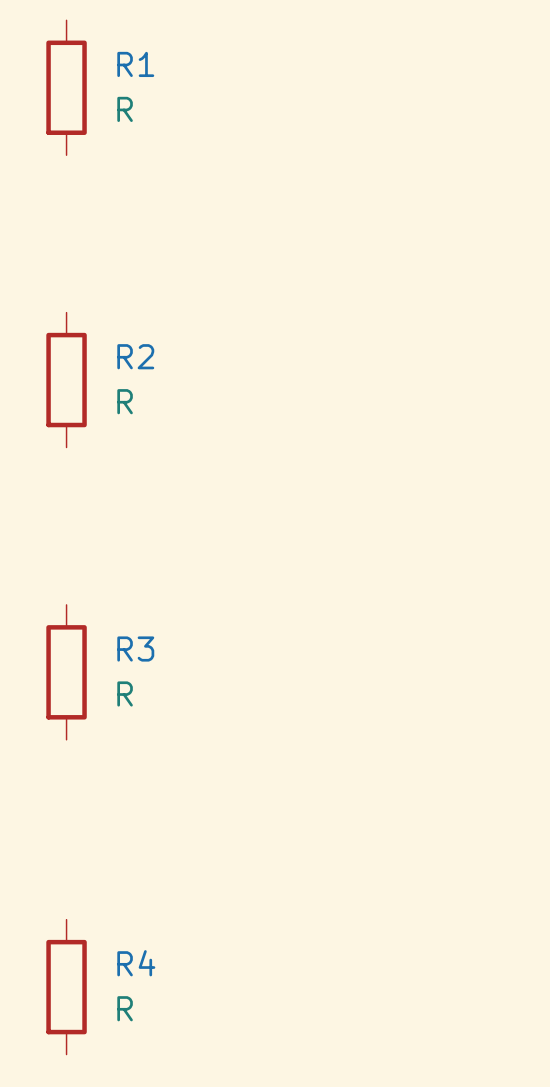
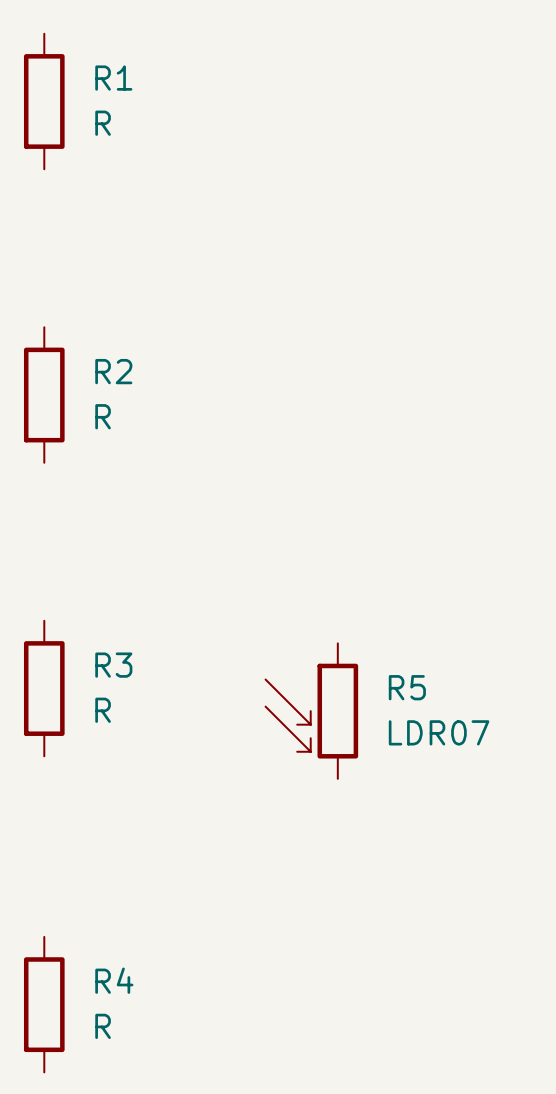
R5: none -> LDR07 (311, 711)

